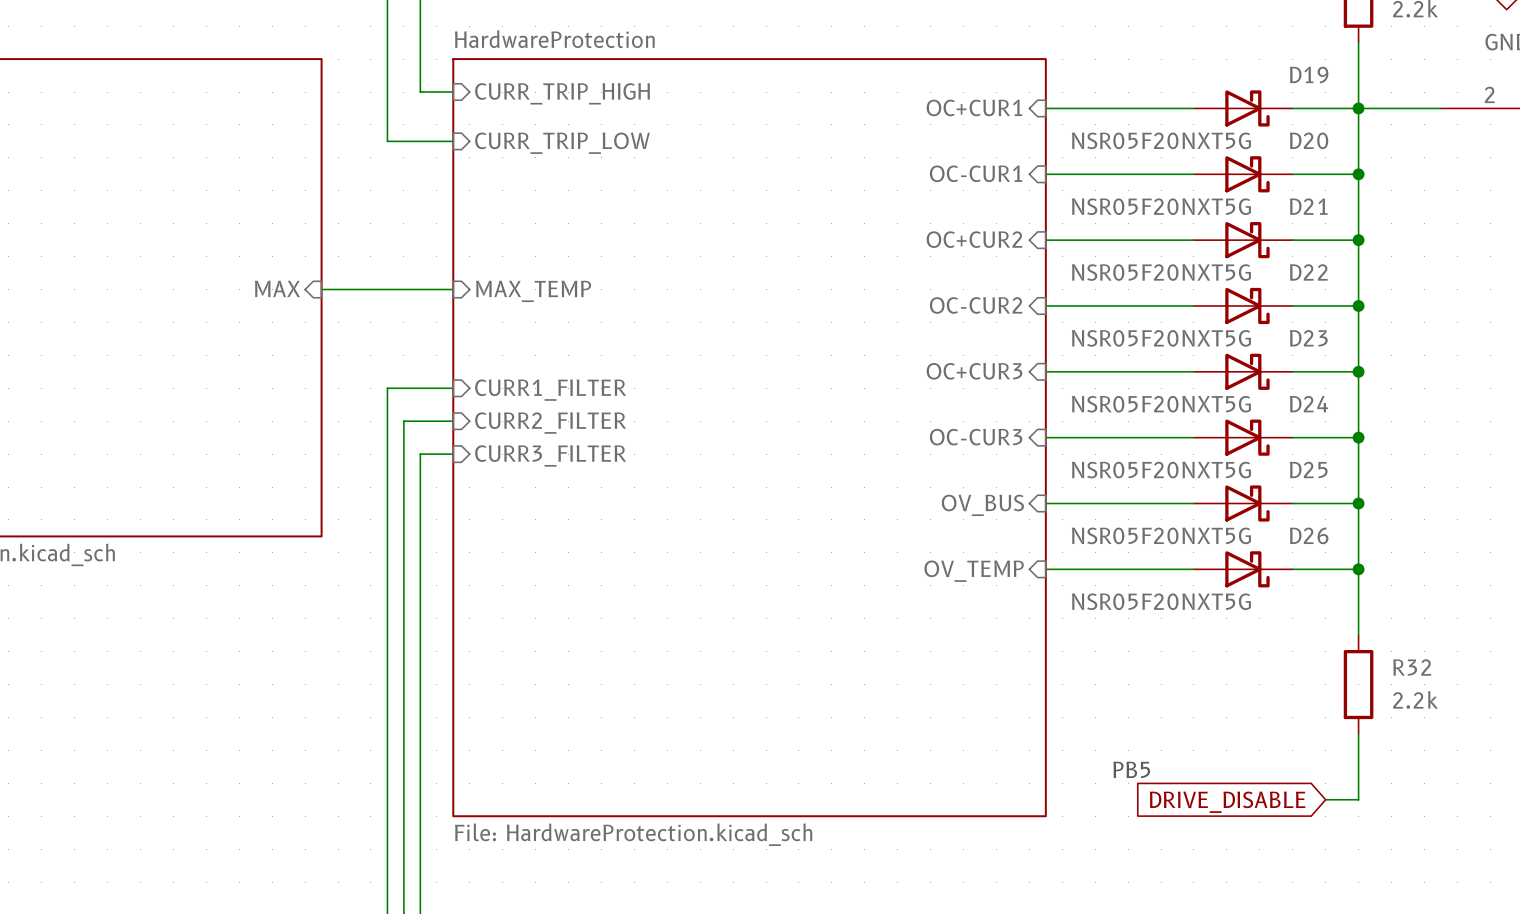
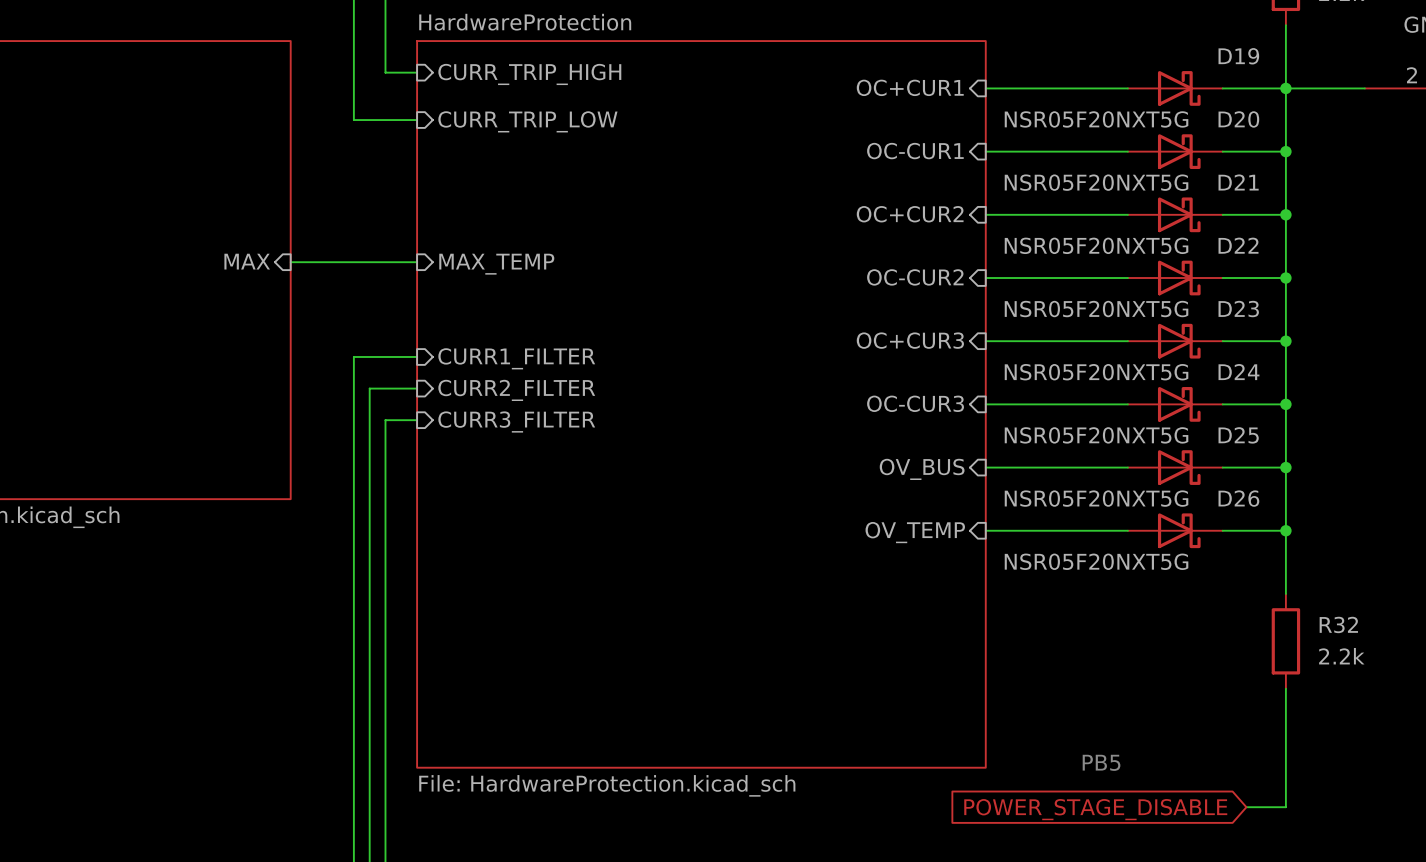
text position: PB5 (1131, 769) -> PB5 (1101, 762)
wire: (1325, 799) (1358, 799) -> (1246, 807) (1285, 807) (1285, 751)
global label: DRIVE_DISABLE (1227, 802) -> none
global label: none -> POWER_STAGE_DISABLE (1095, 809)

